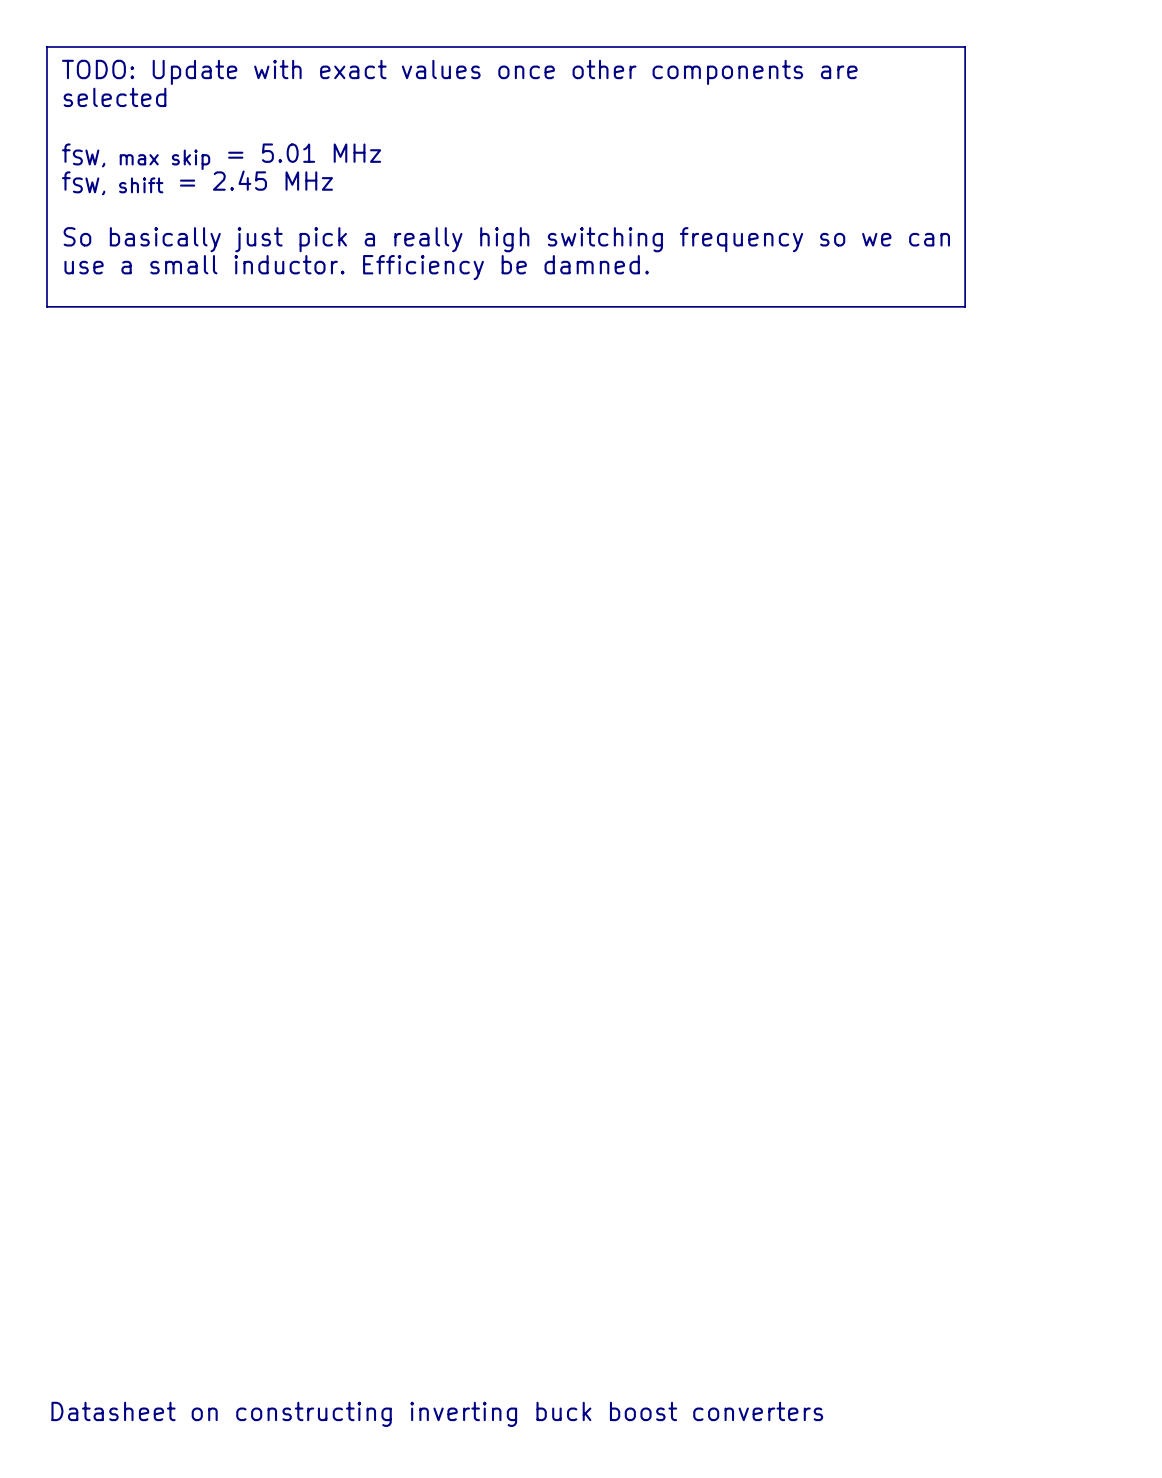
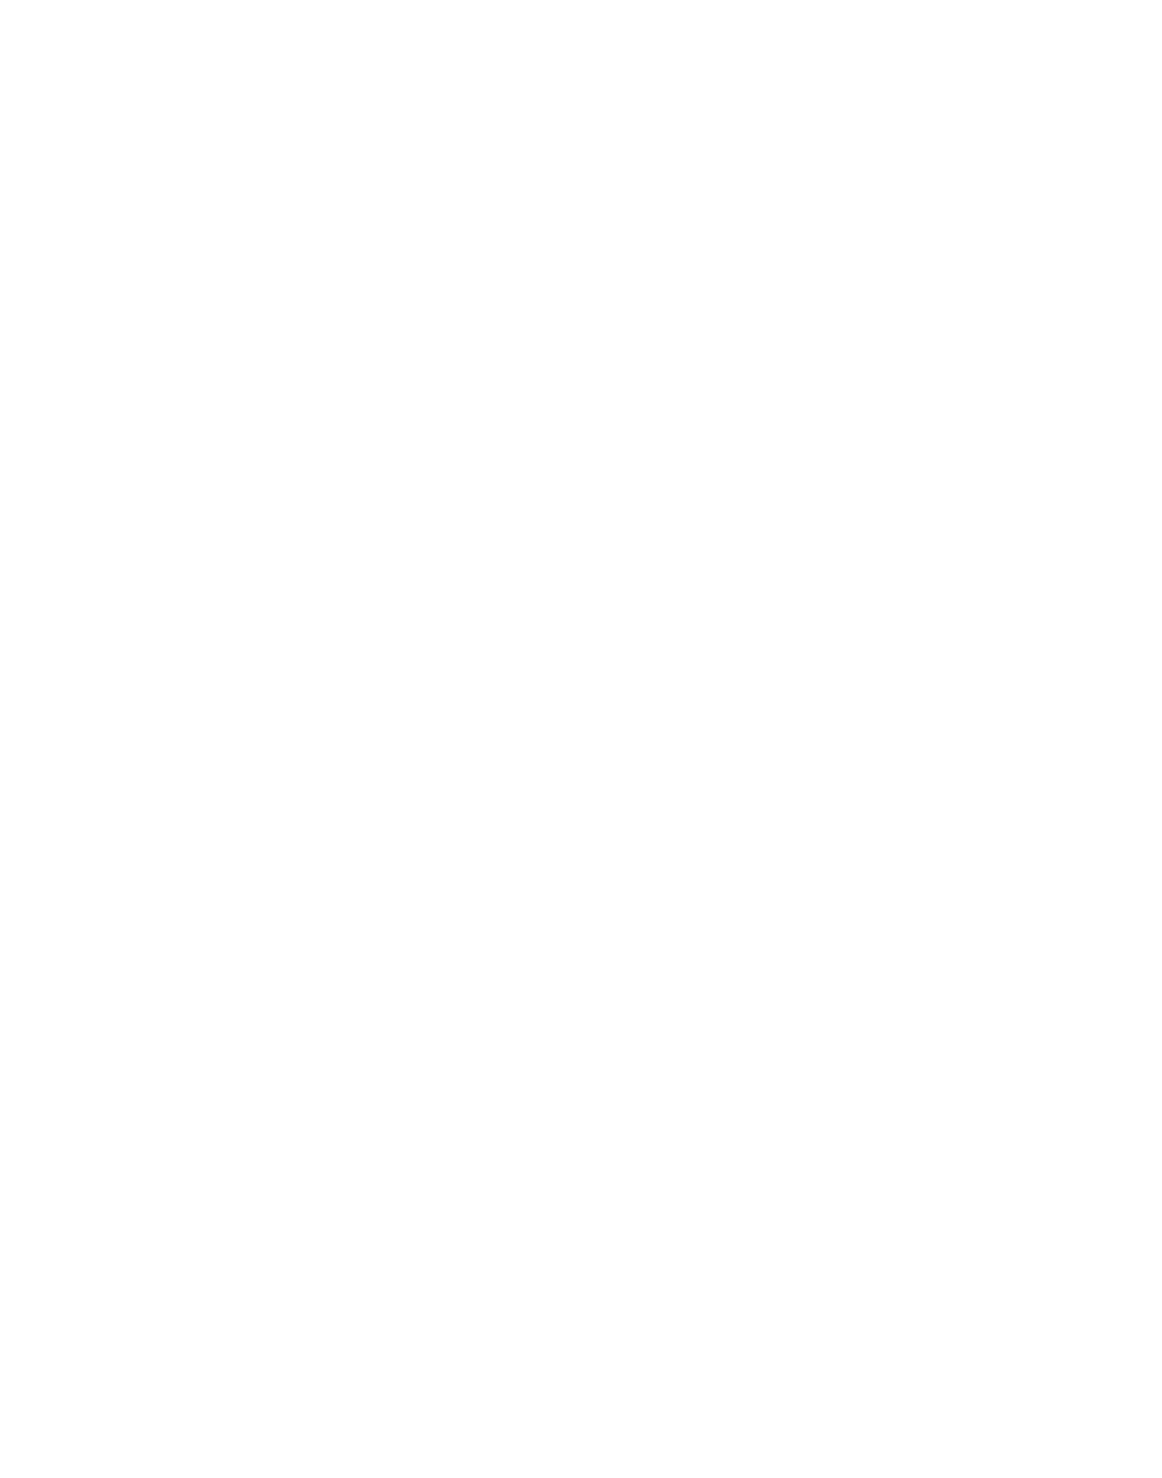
line: (47, 47) (965, 47) (965, 306) (47, 306) (47, 47) -> none
text: TODO: Update with exact values once other components are (459, 72) -> none
text: selected (114, 97) -> none
text: fSW, max skip = 5.01 MHz (221, 156) -> none
text: fSW, shift = 2.45 MHz (197, 182) -> none
text: So basically just pick a really high switching frequency so we can (506, 239) -> none
text: use a small inductor. Efficiency be damned. (356, 267) -> none
text: Datasheet on constructing inverting buck boost converters (437, 1414) -> none

